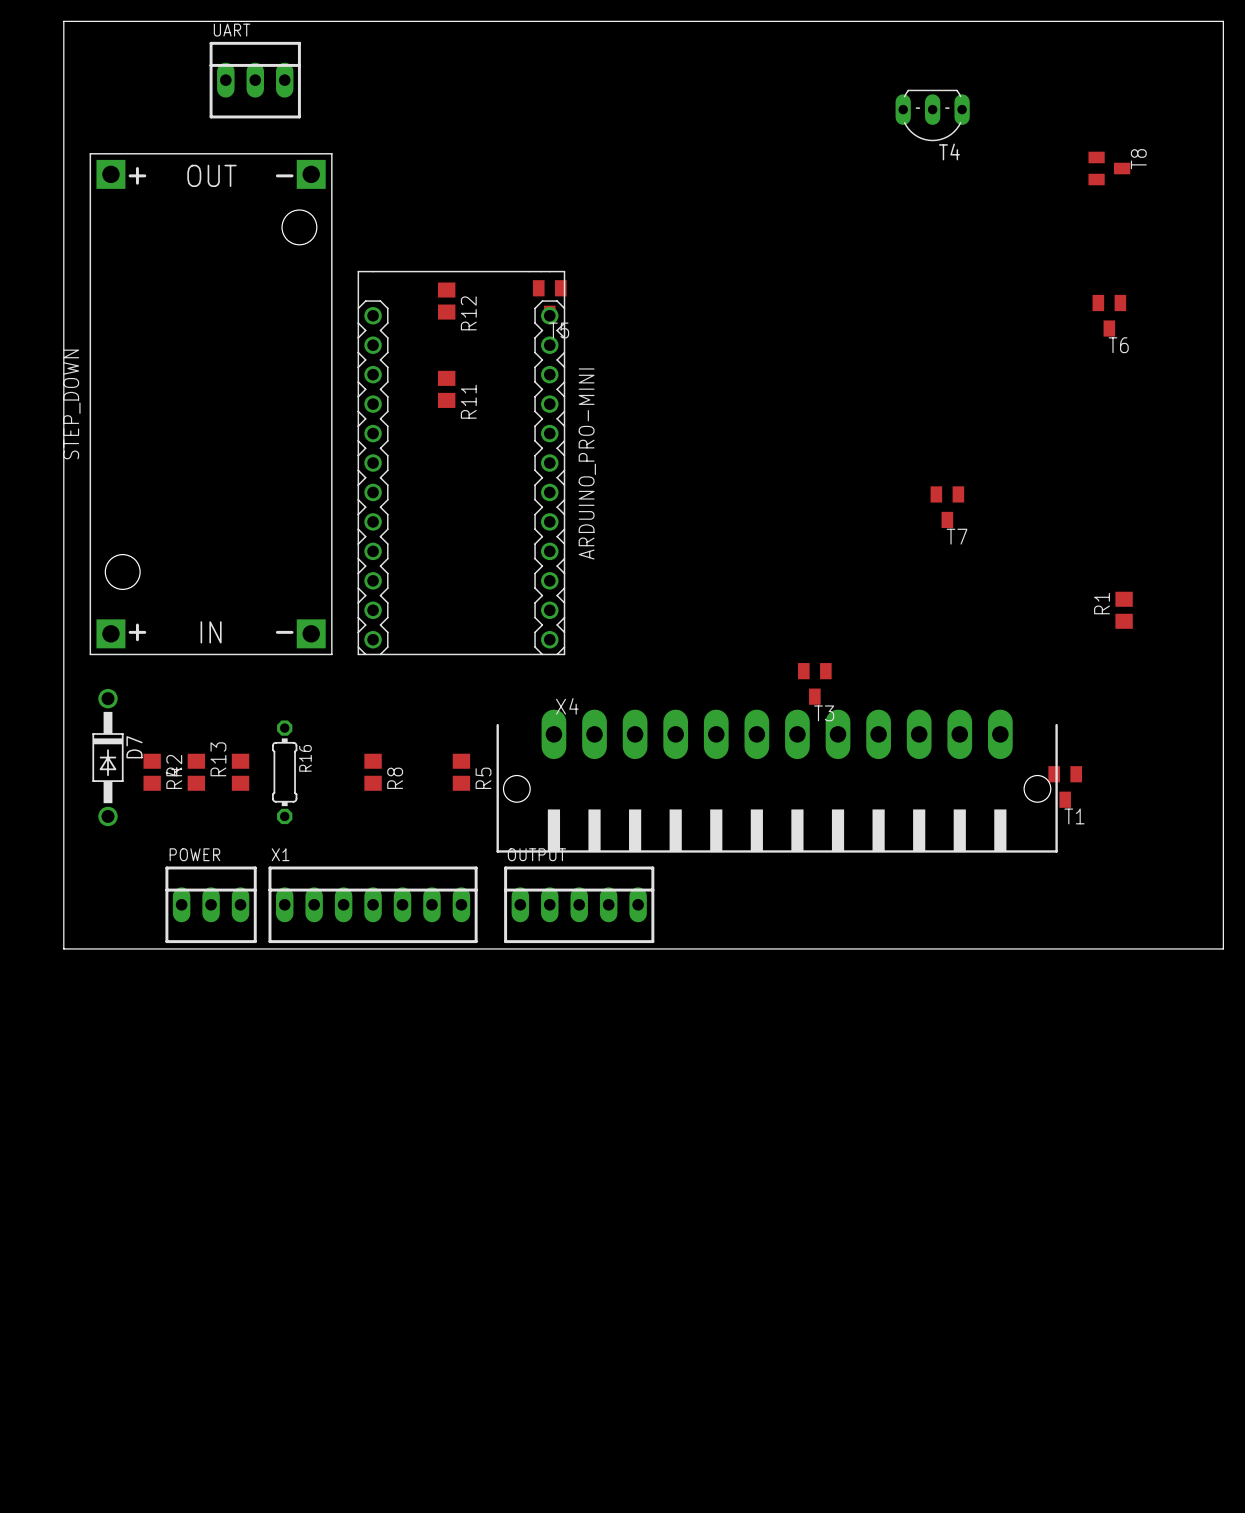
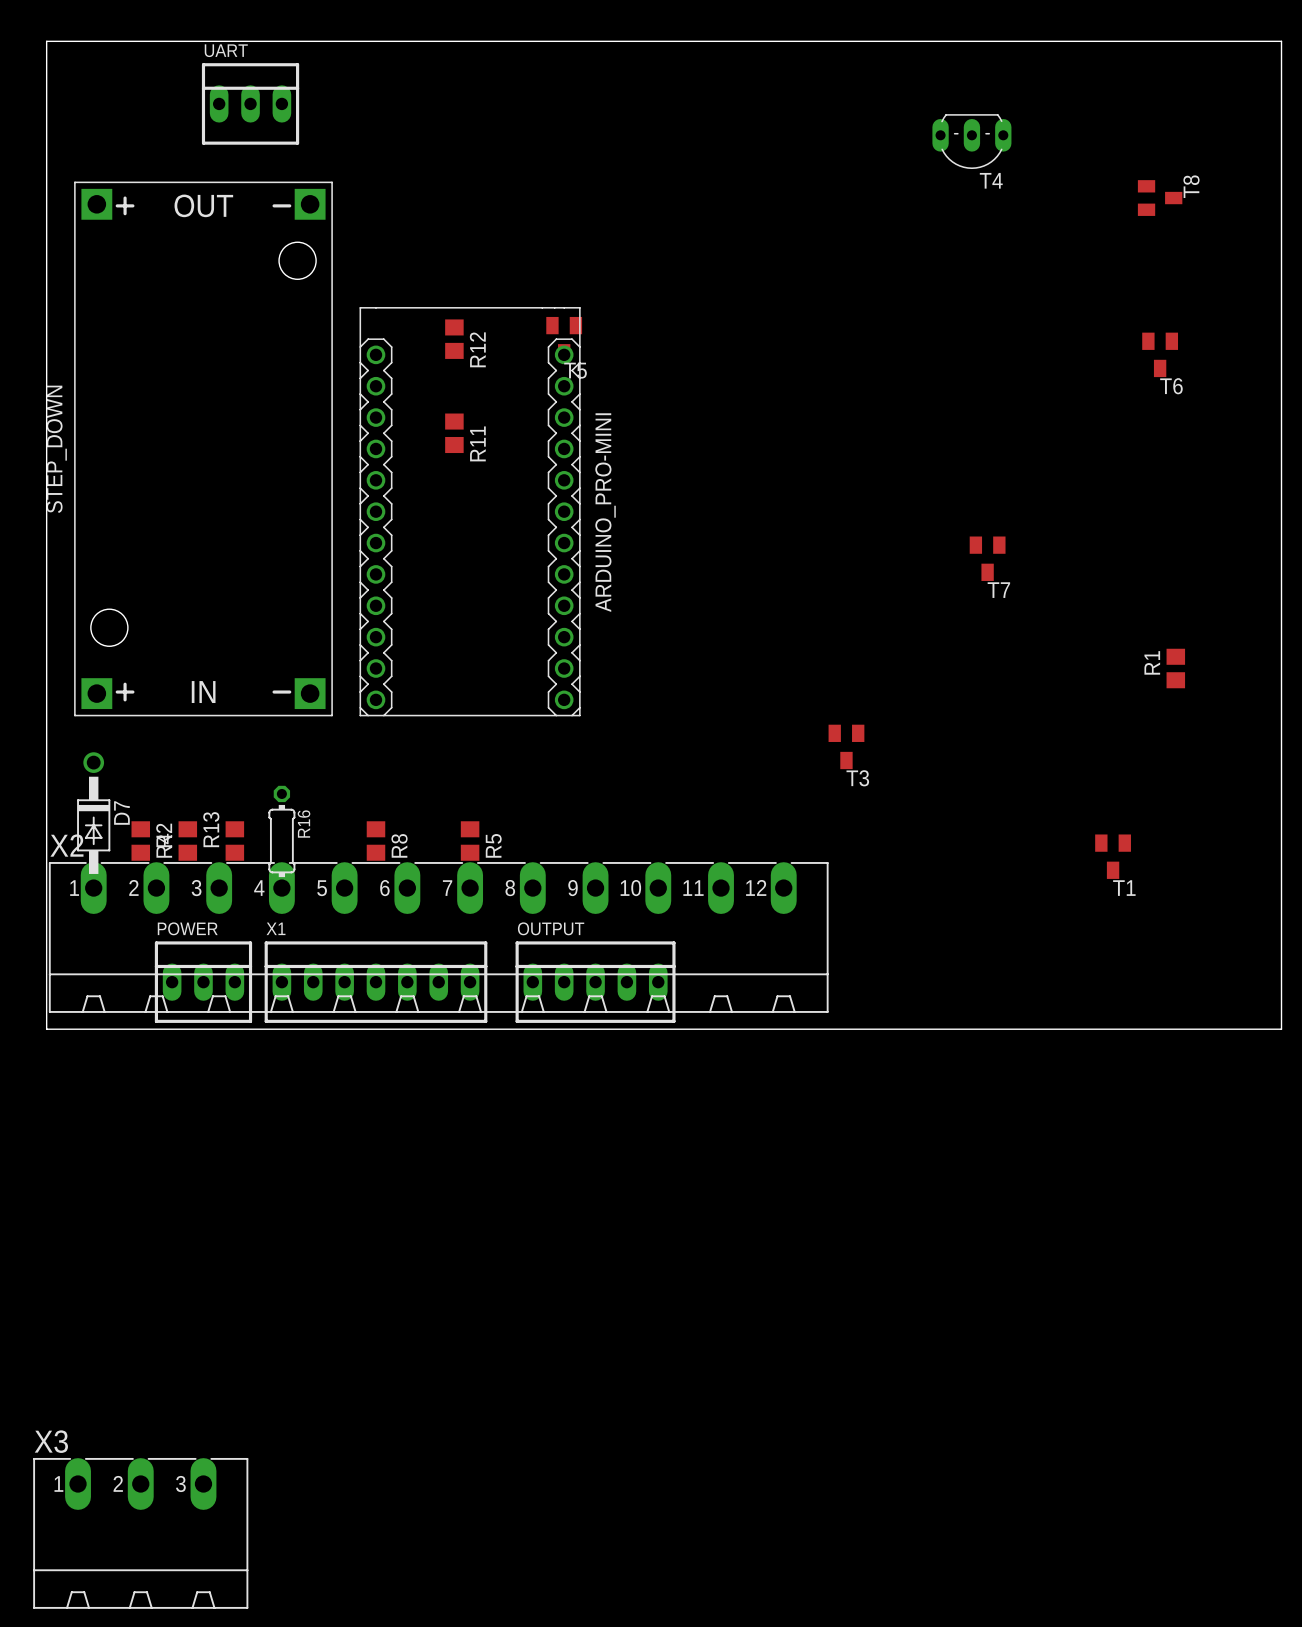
X4: (777, 781) -> none
X2: none -> (438, 937)
X3: none -> (140, 1533)

